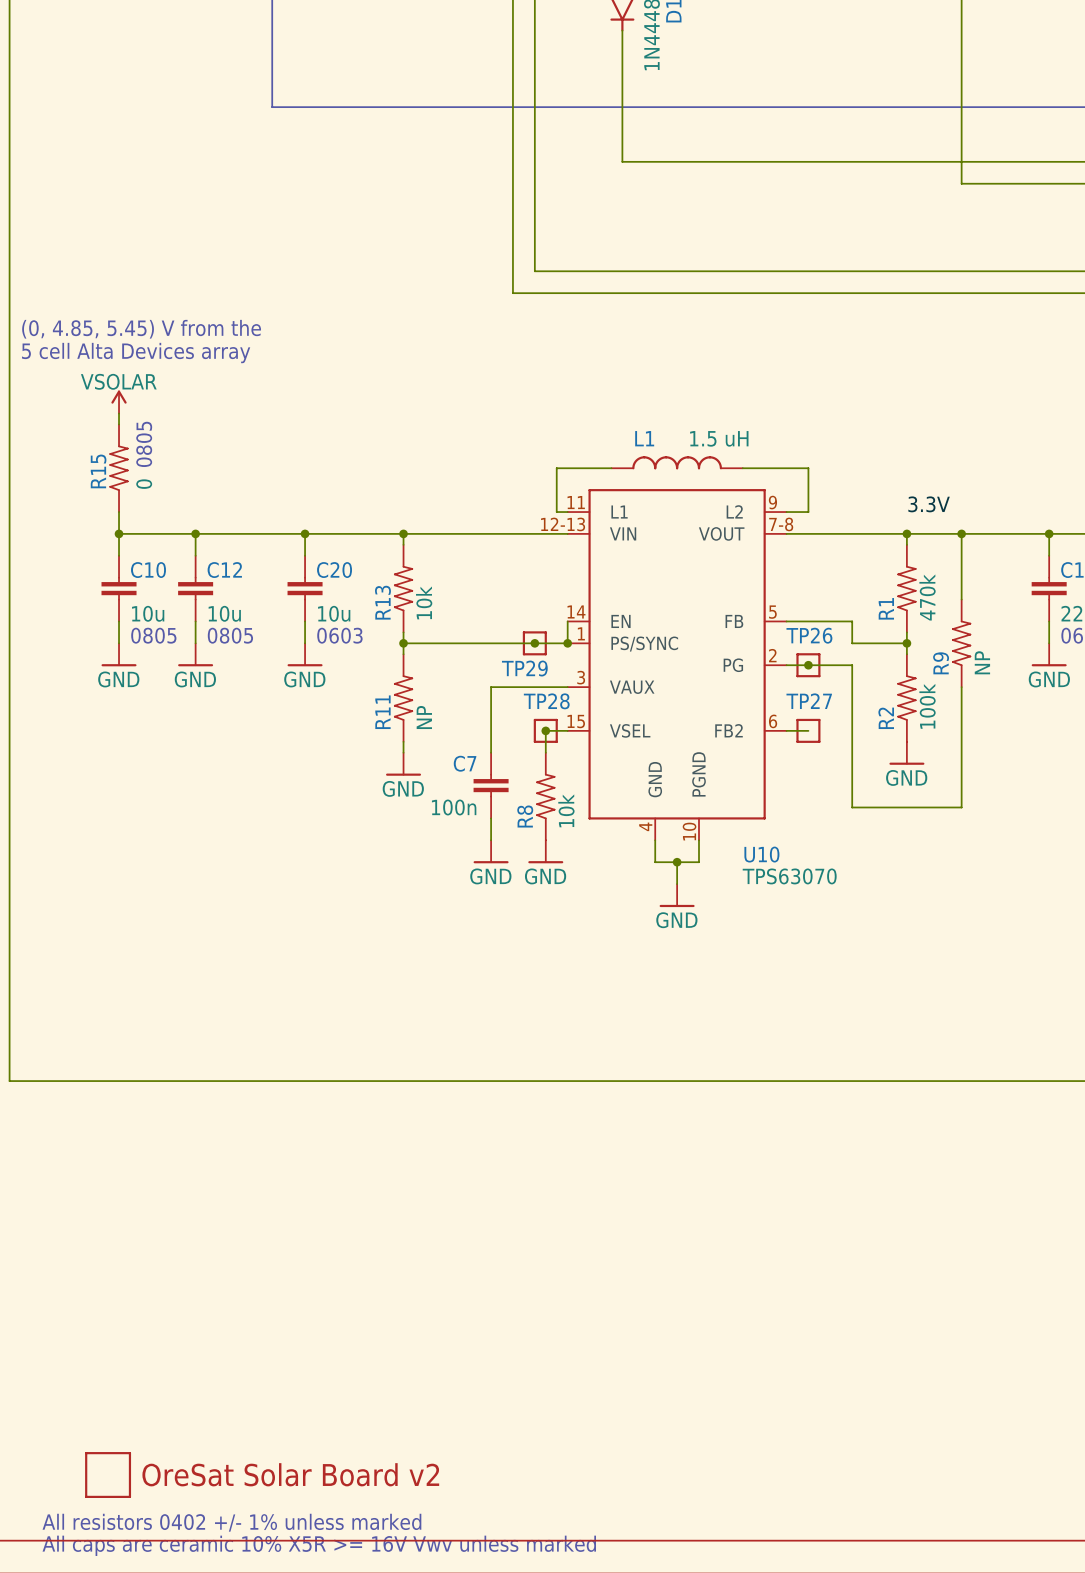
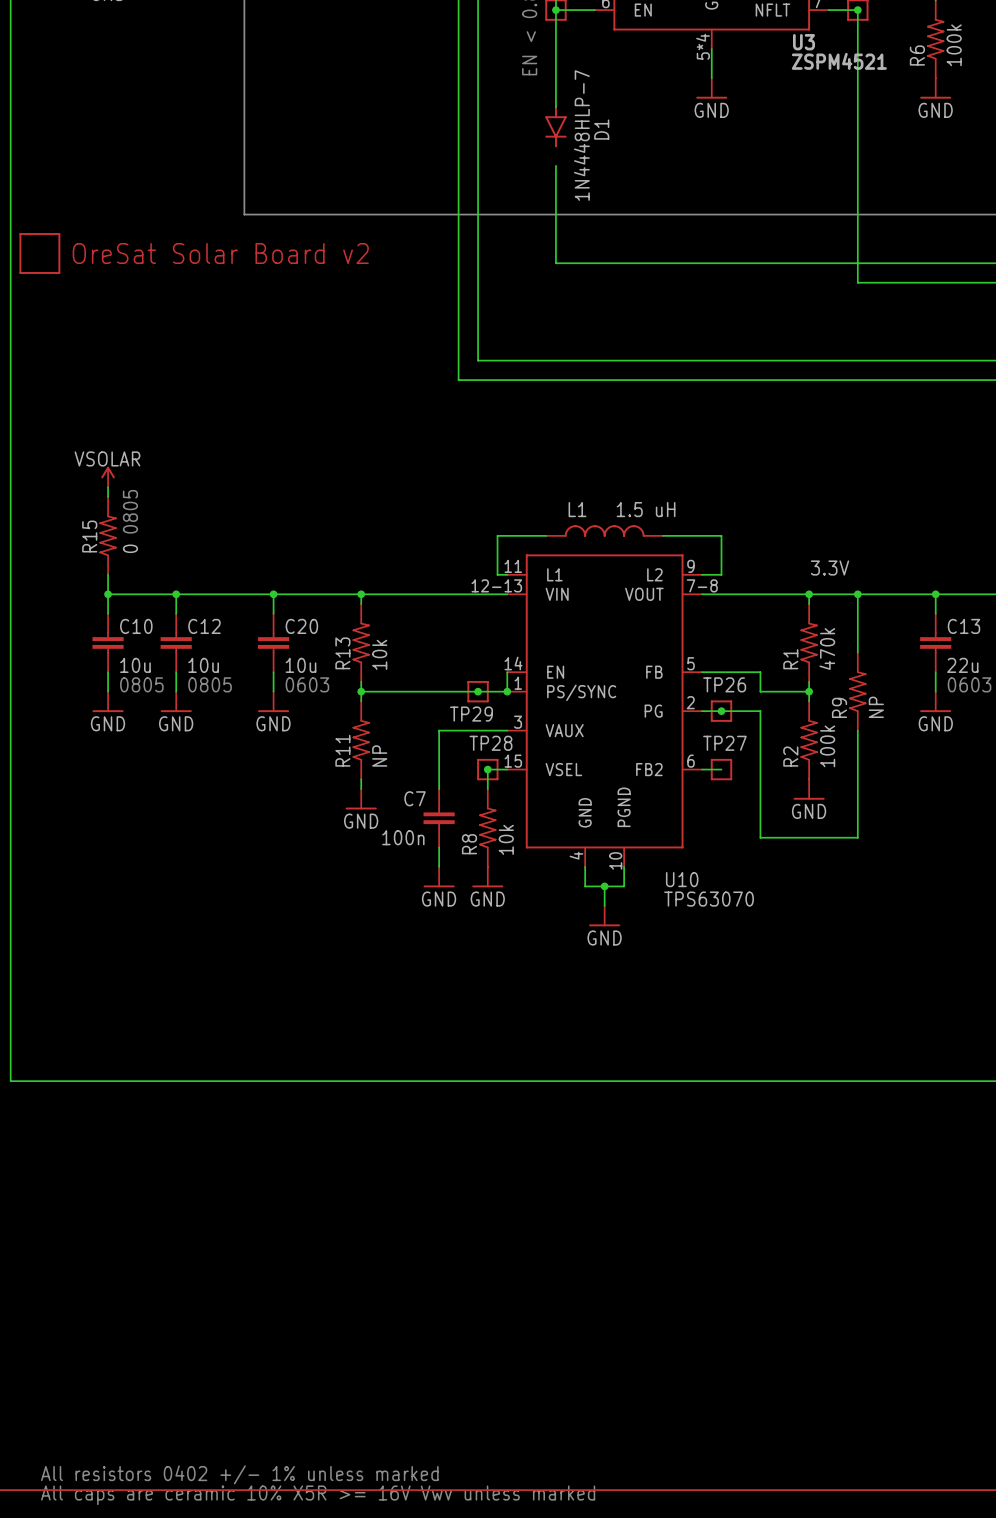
wire: (622, 30) (622, 52) -> none
part: none -> (39, 253)
text: (0, 4.85, 5.45) V from the (141, 329) -> none
text: 5 cell Alta Devices array (136, 353) -> none
part: (108, 1475) -> none

